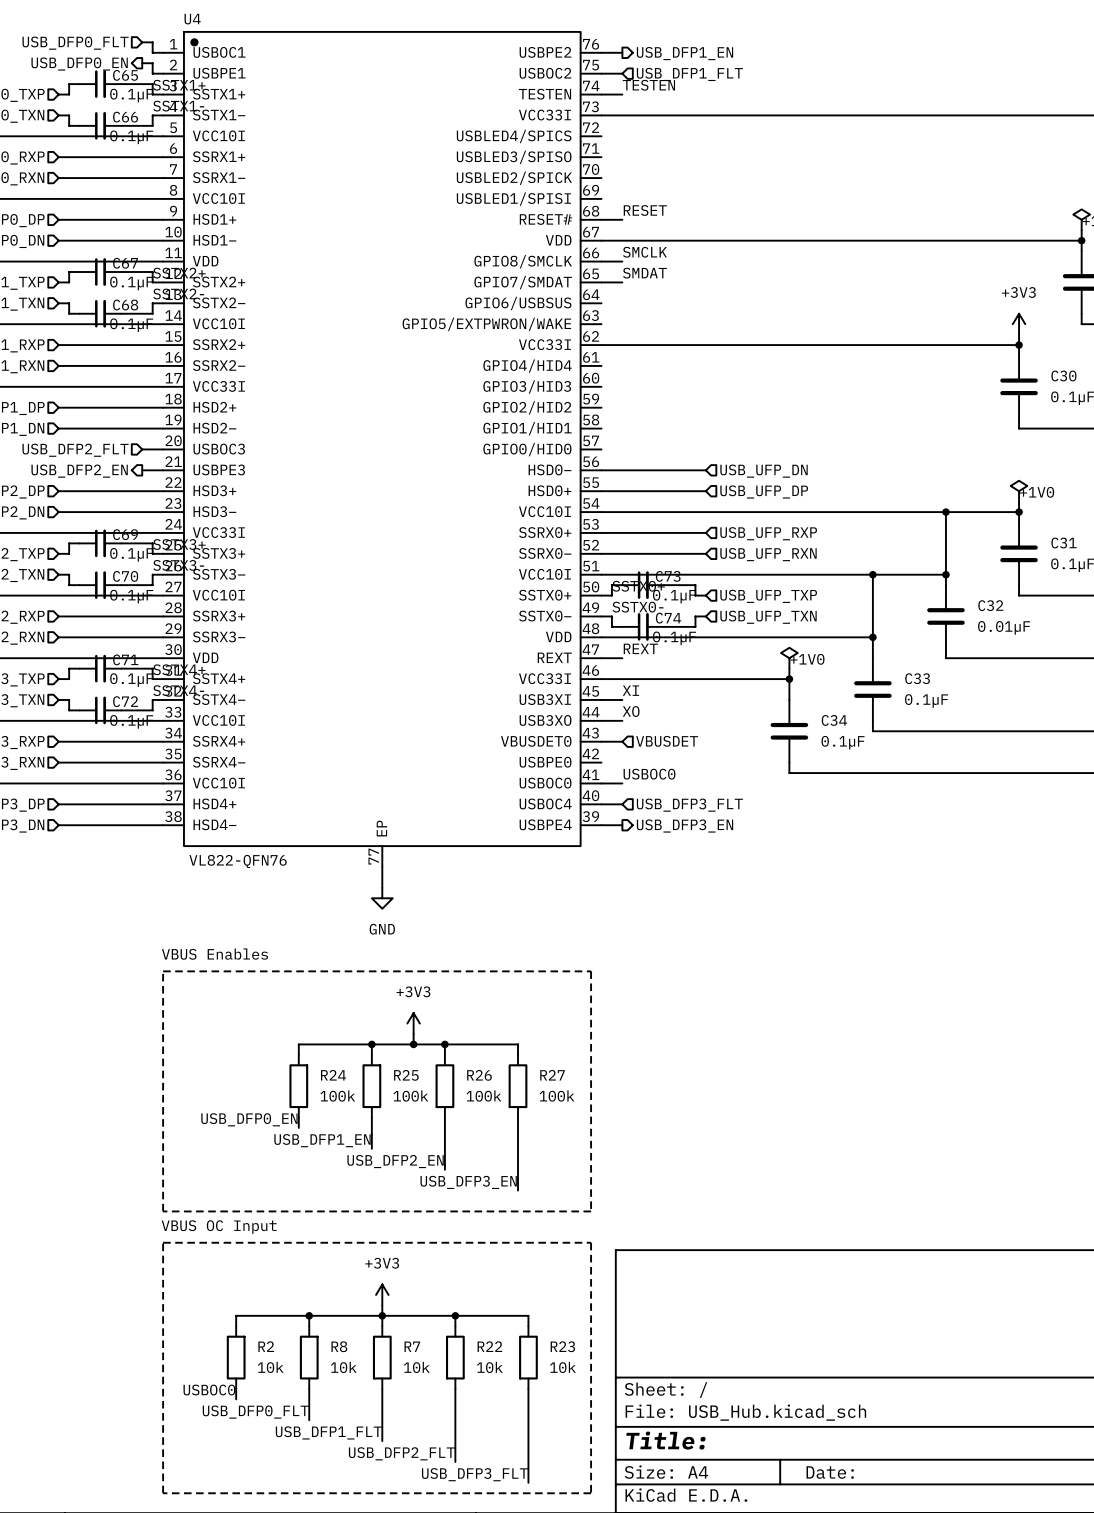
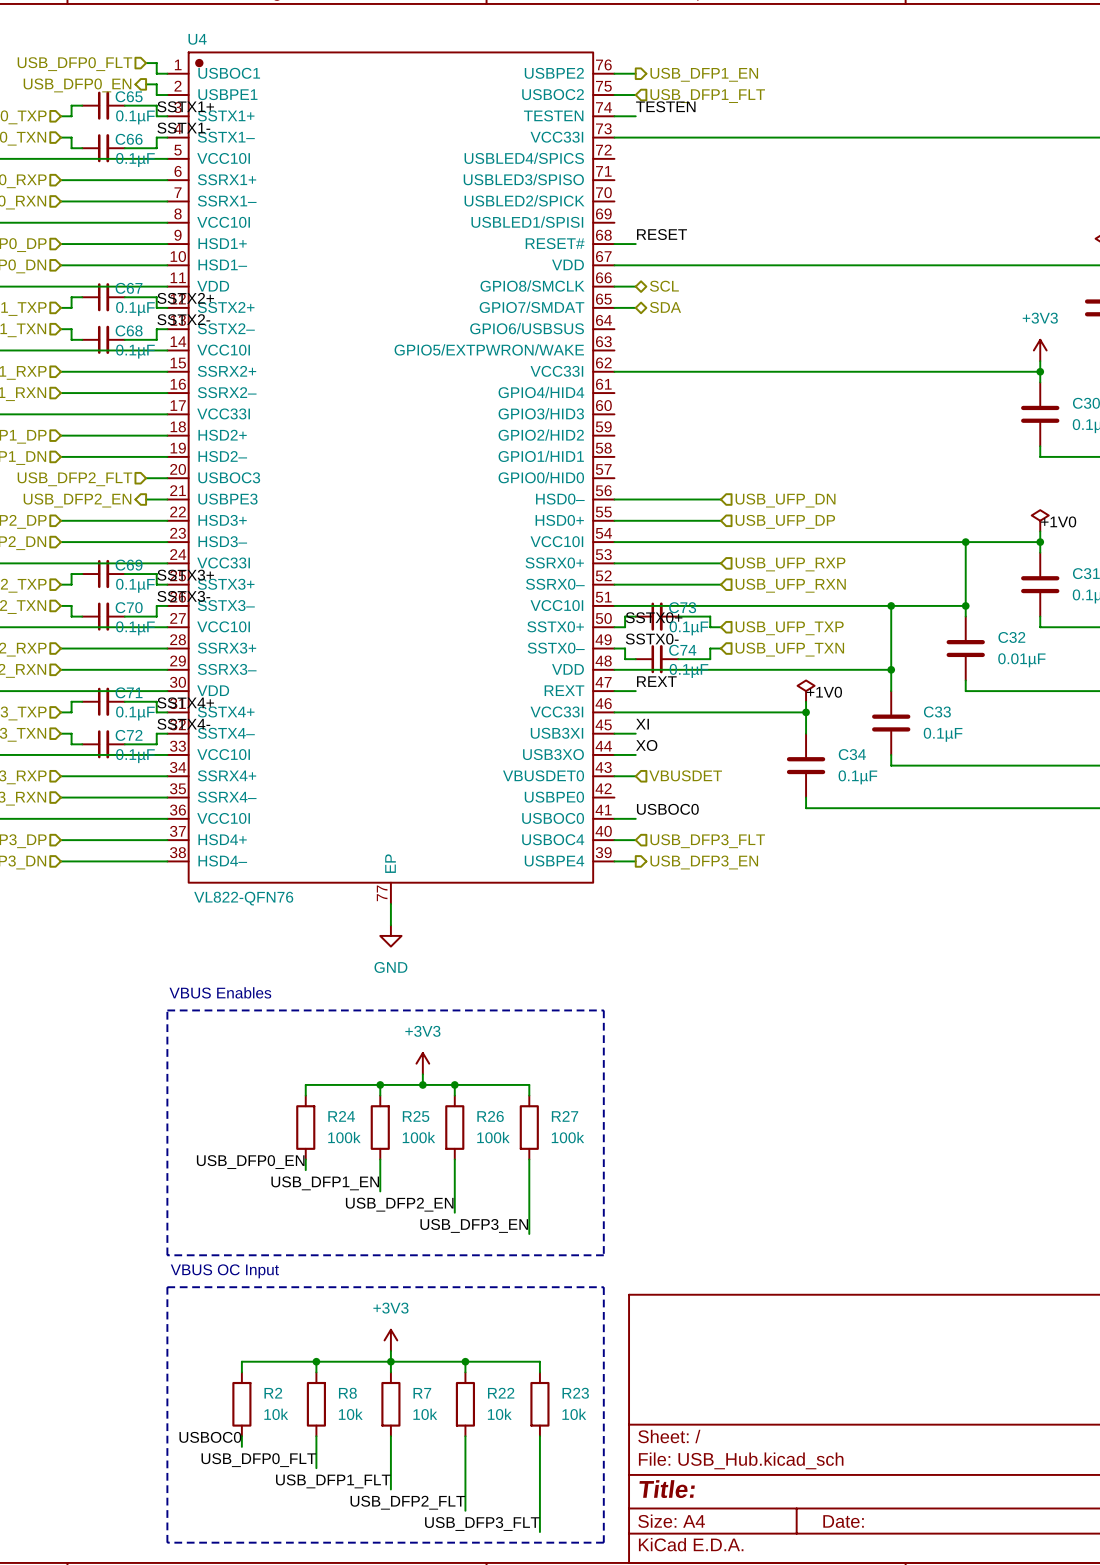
label: SMCLK (644, 252) -> none
hierarchical label: none -> SCL (664, 286)
label: SMDAT (644, 273) -> none
hierarchical label: none -> SDA (665, 307)

